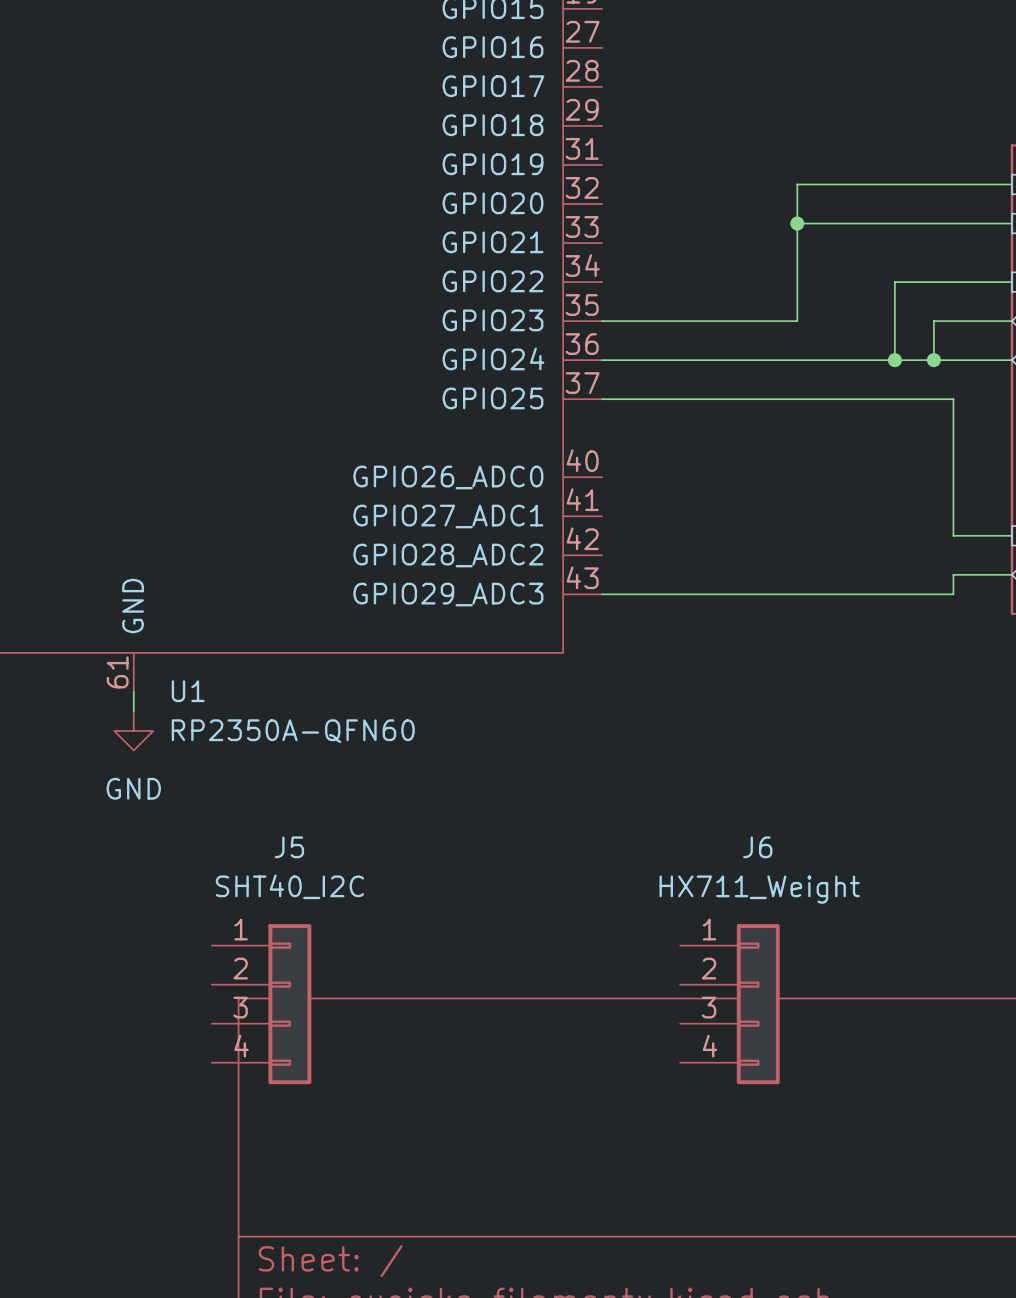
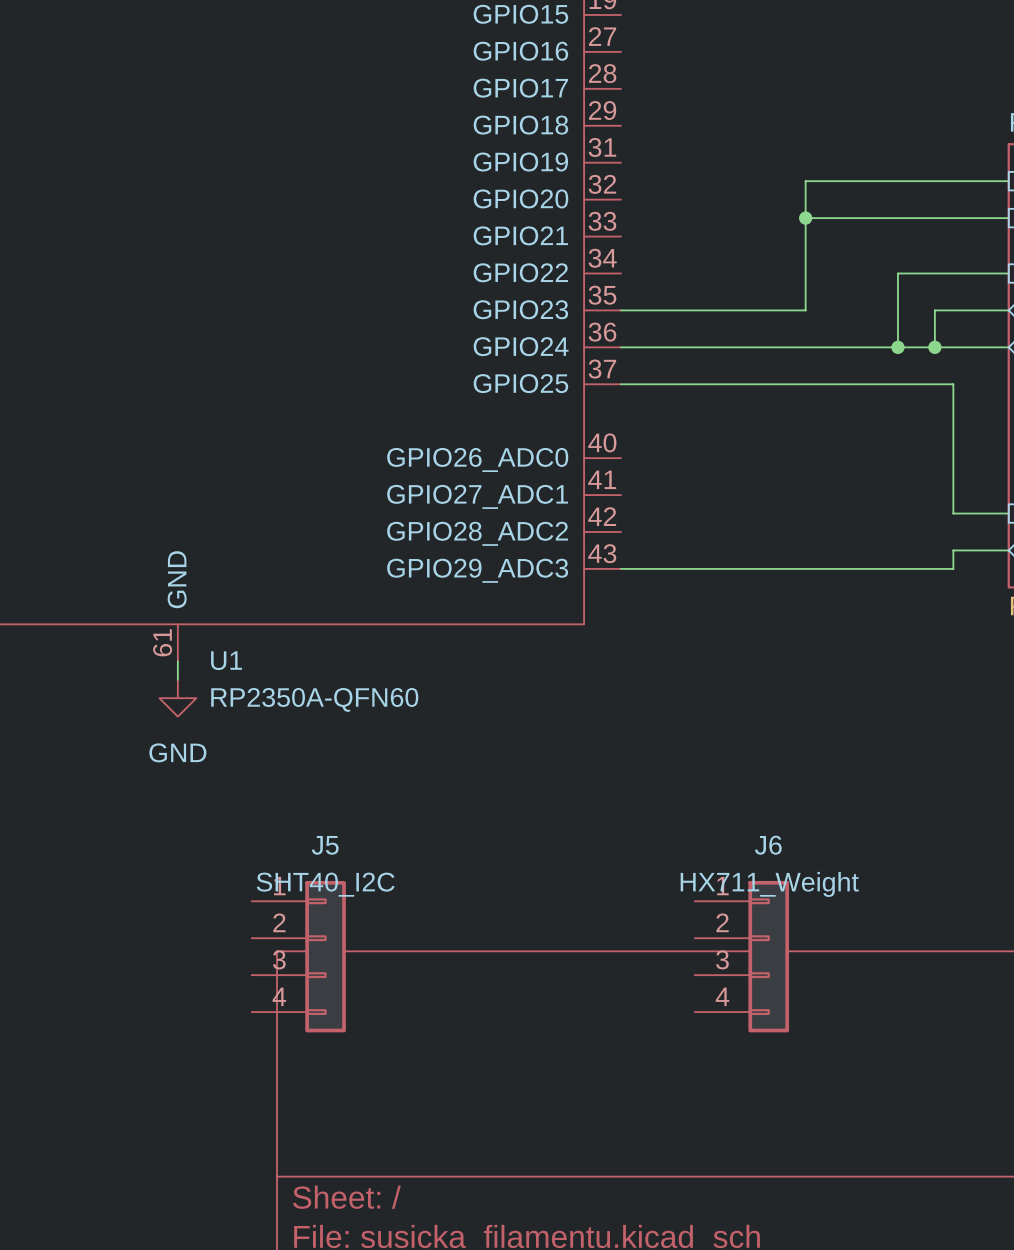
J5 name position: J5 (289, 847) -> J5 (325, 845)
J6 name position: J6 (757, 847) -> J6 (768, 845)
J5 value position: SHT40_I2C (289, 886) -> SHT40_I2C (325, 884)
J6 value position: HX711_Weight (759, 889) -> HX711_Weight (769, 884)

